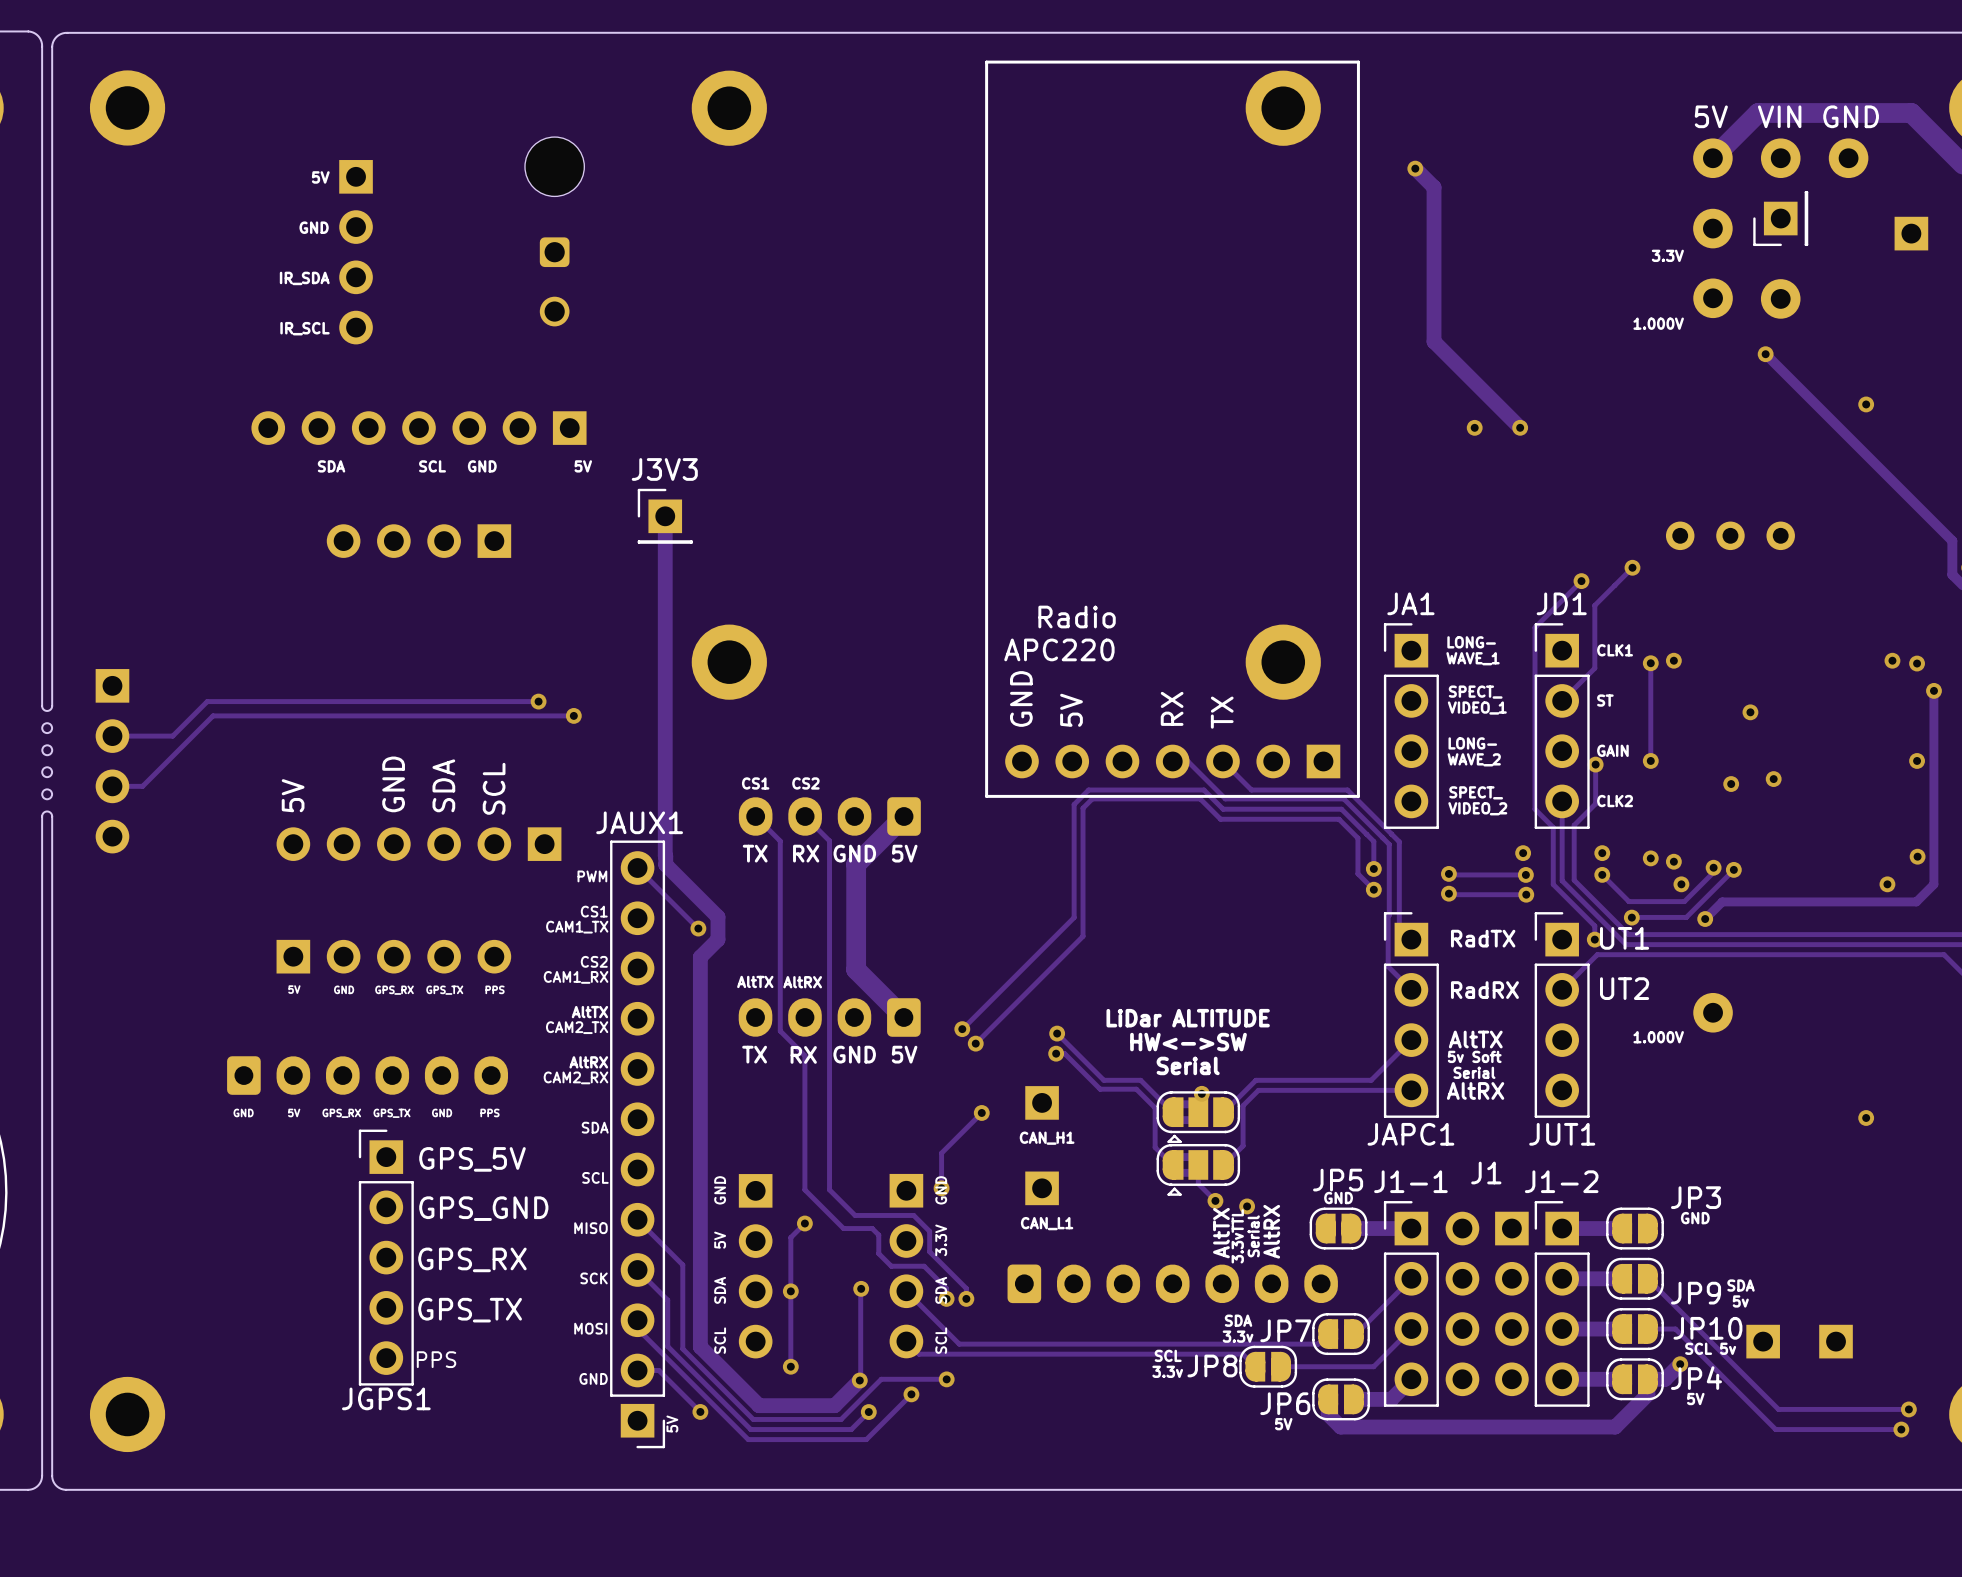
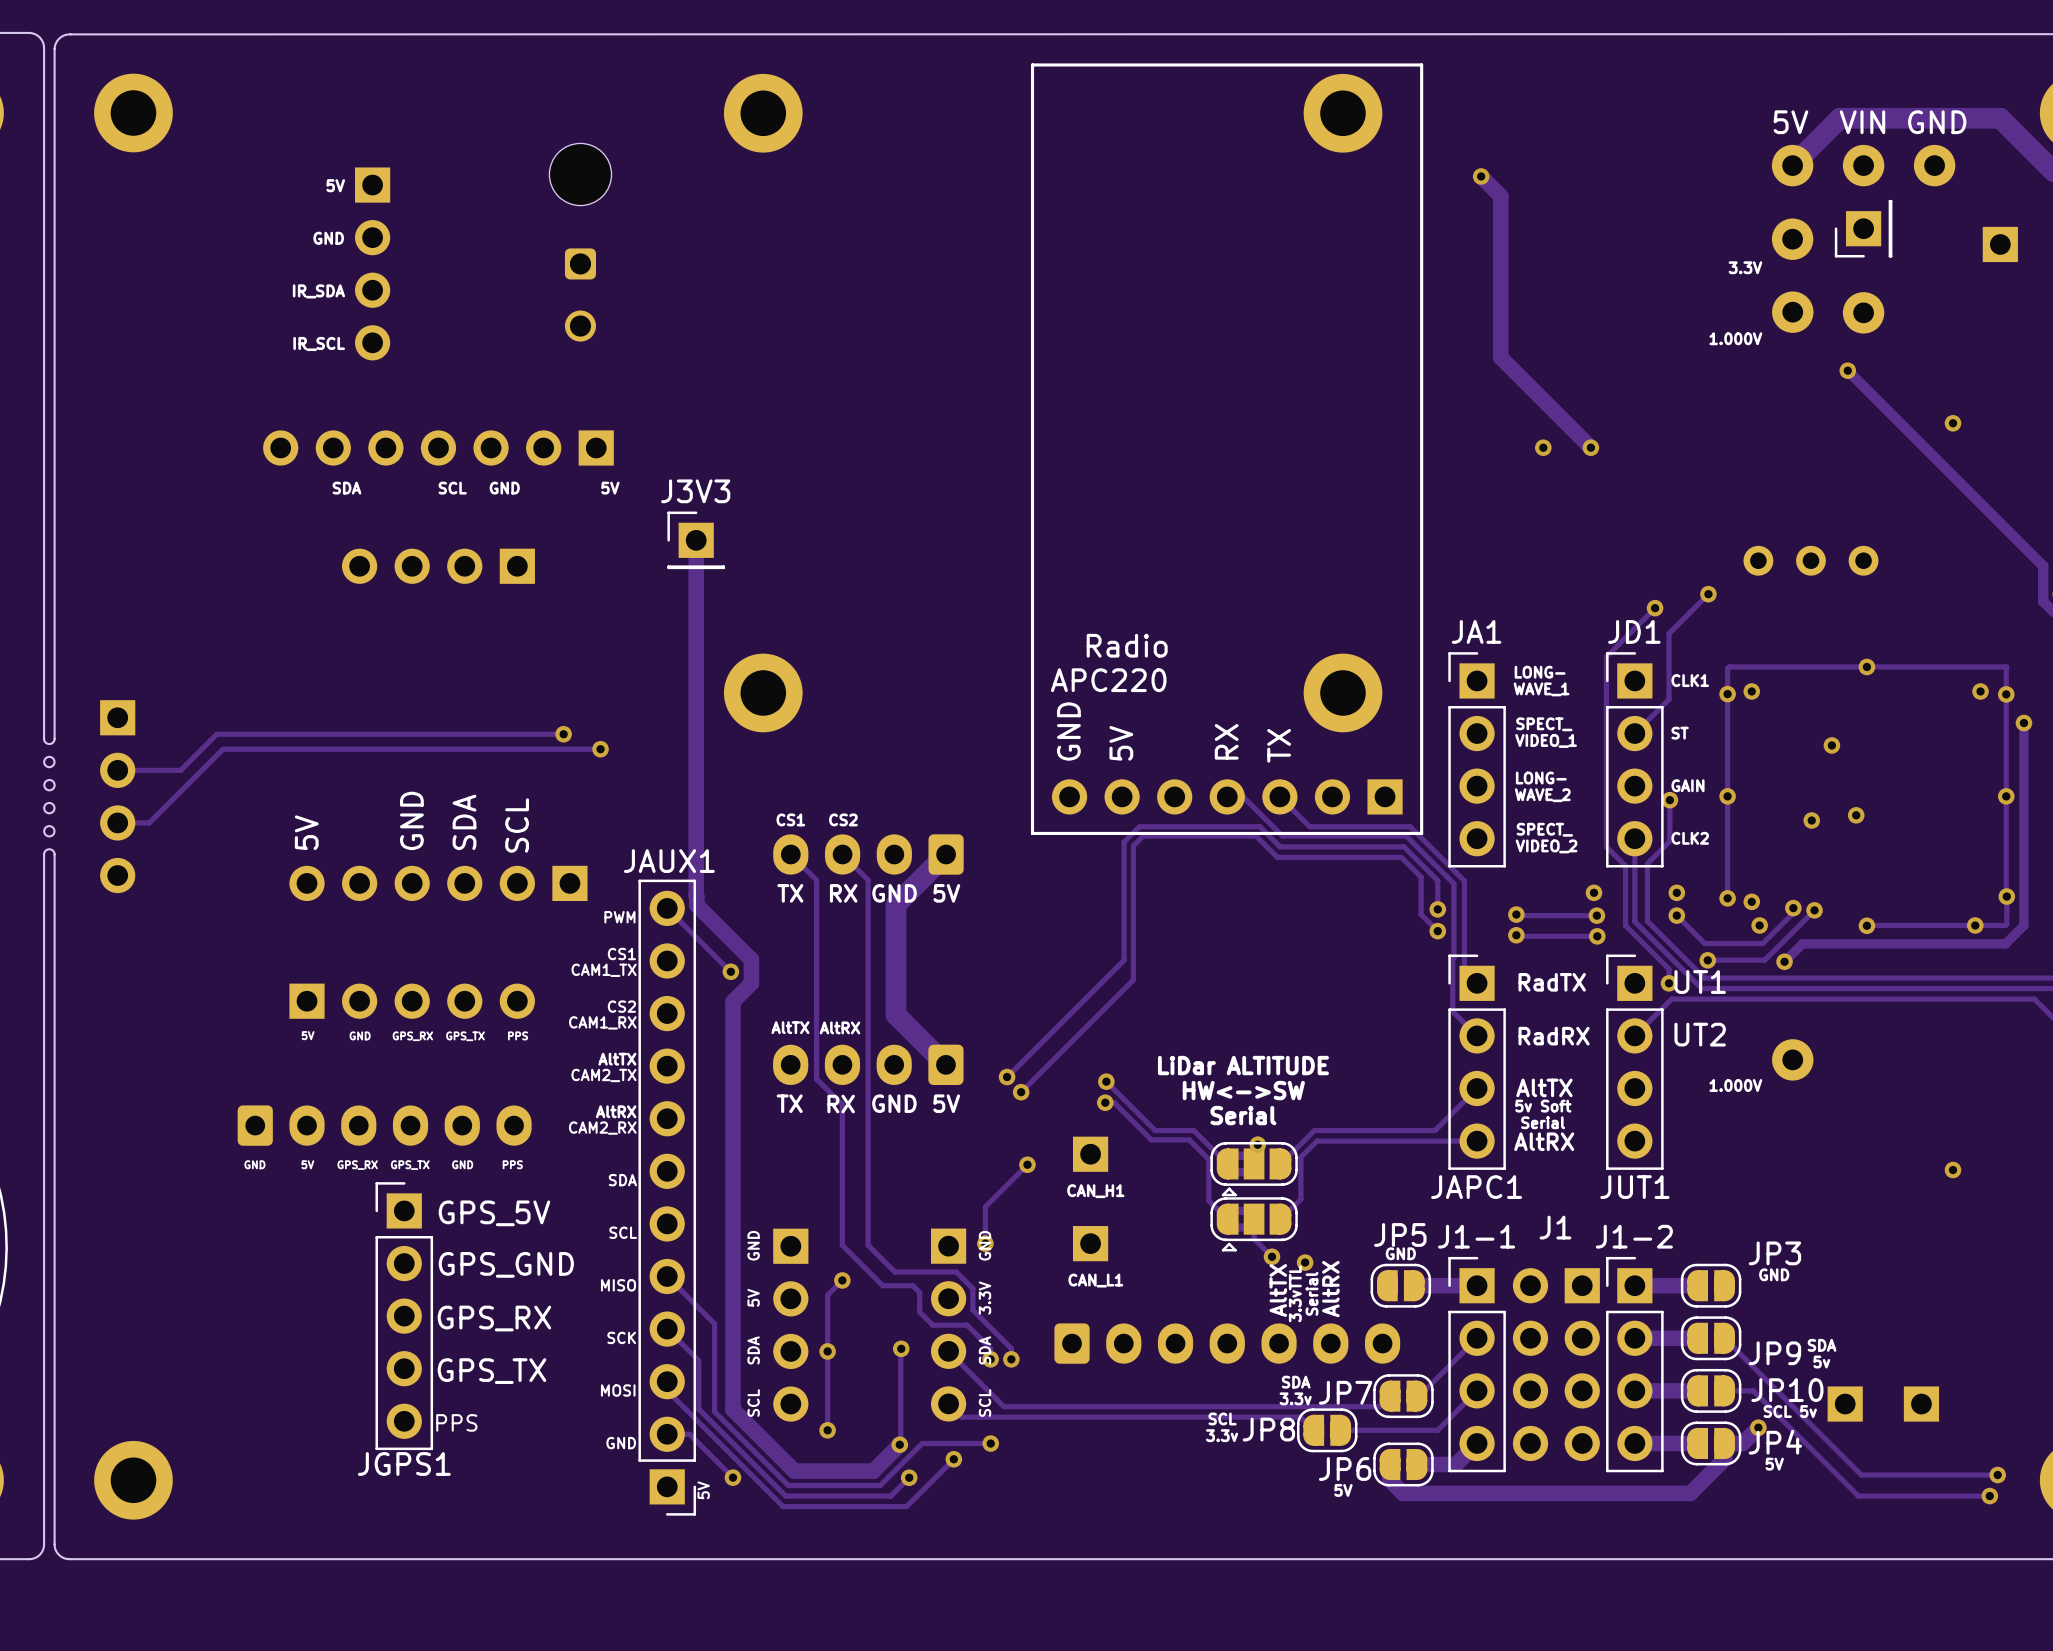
via: none -> (1866, 666)
track: none -> (1727, 694) (1727, 668) (1729, 666) (2006, 667) (2006, 924) (1867, 925)
track: none -> (1727, 796) (1727, 898)
via: none -> (1866, 925)

